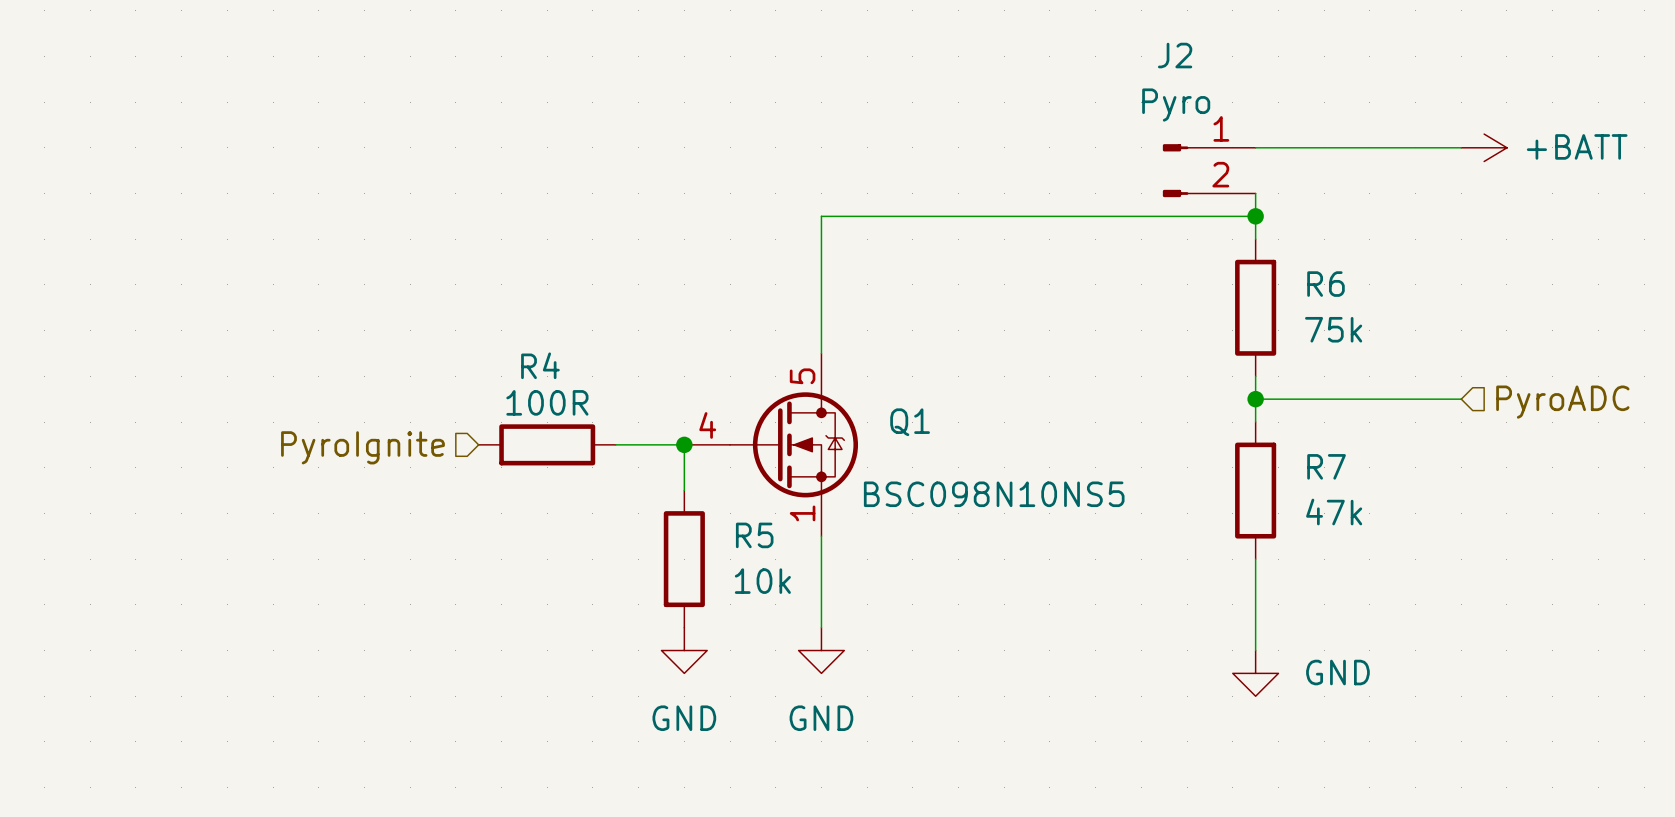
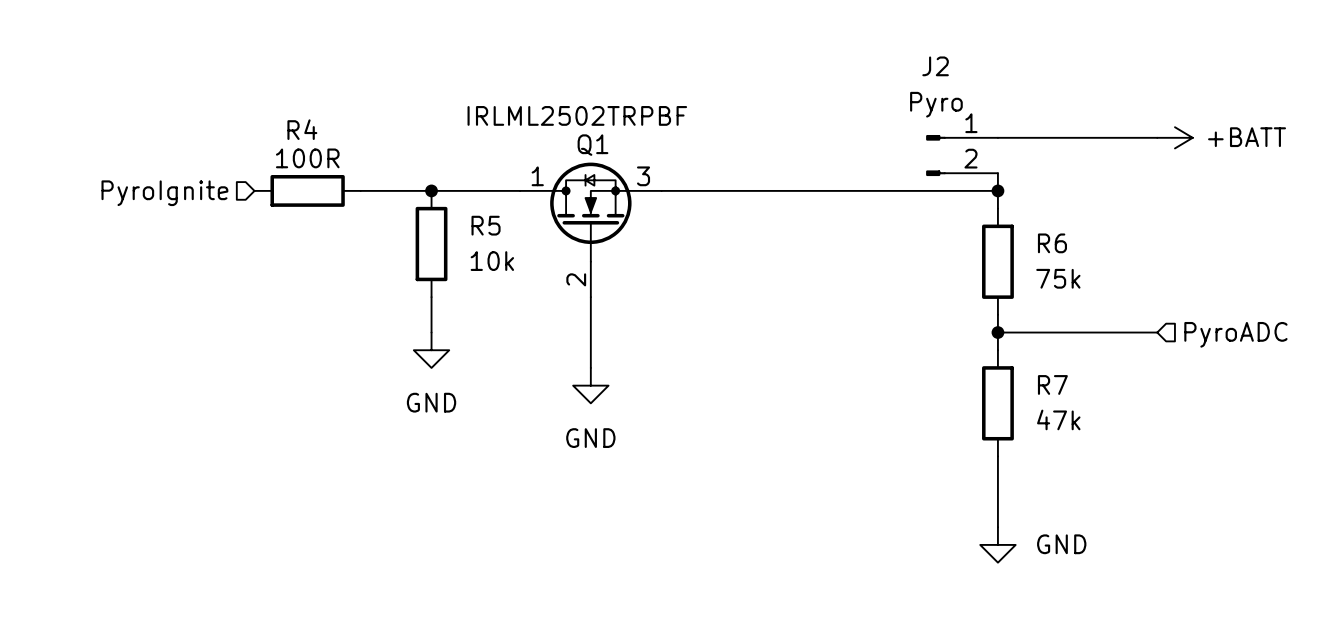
wire: none -> (360, 190) (520, 190)
junction: none -> (431, 190)
wire: (821, 216) (821, 353) -> none
wire: none -> (431, 297) (431, 332)
Q1 symbol: [684, 353, 859, 537] -> [520, 162, 662, 298]
power symbol: none -> GND (431, 350)
Q1 name position: Q1 (910, 422) -> Q1 (592, 145)
R4 position: (547, 444) -> (307, 190)
wire: (615, 444) (684, 444) (684, 490) -> none
junction: (684, 444) -> none
hierarchical label position: PyroIgnite (362, 447) -> PyroIgnite (164, 193)
power symbol: none -> GND (590, 385)
Q1 value: BSC098N10NS5 (994, 494) -> IRLML2502TRPBF (577, 115)
wire: (821, 536) (821, 627) -> (590, 297) (590, 367)
R5 position: (684, 559) -> (431, 244)
power symbol: GND (684, 650) -> none
power symbol: GND (821, 650) -> none

